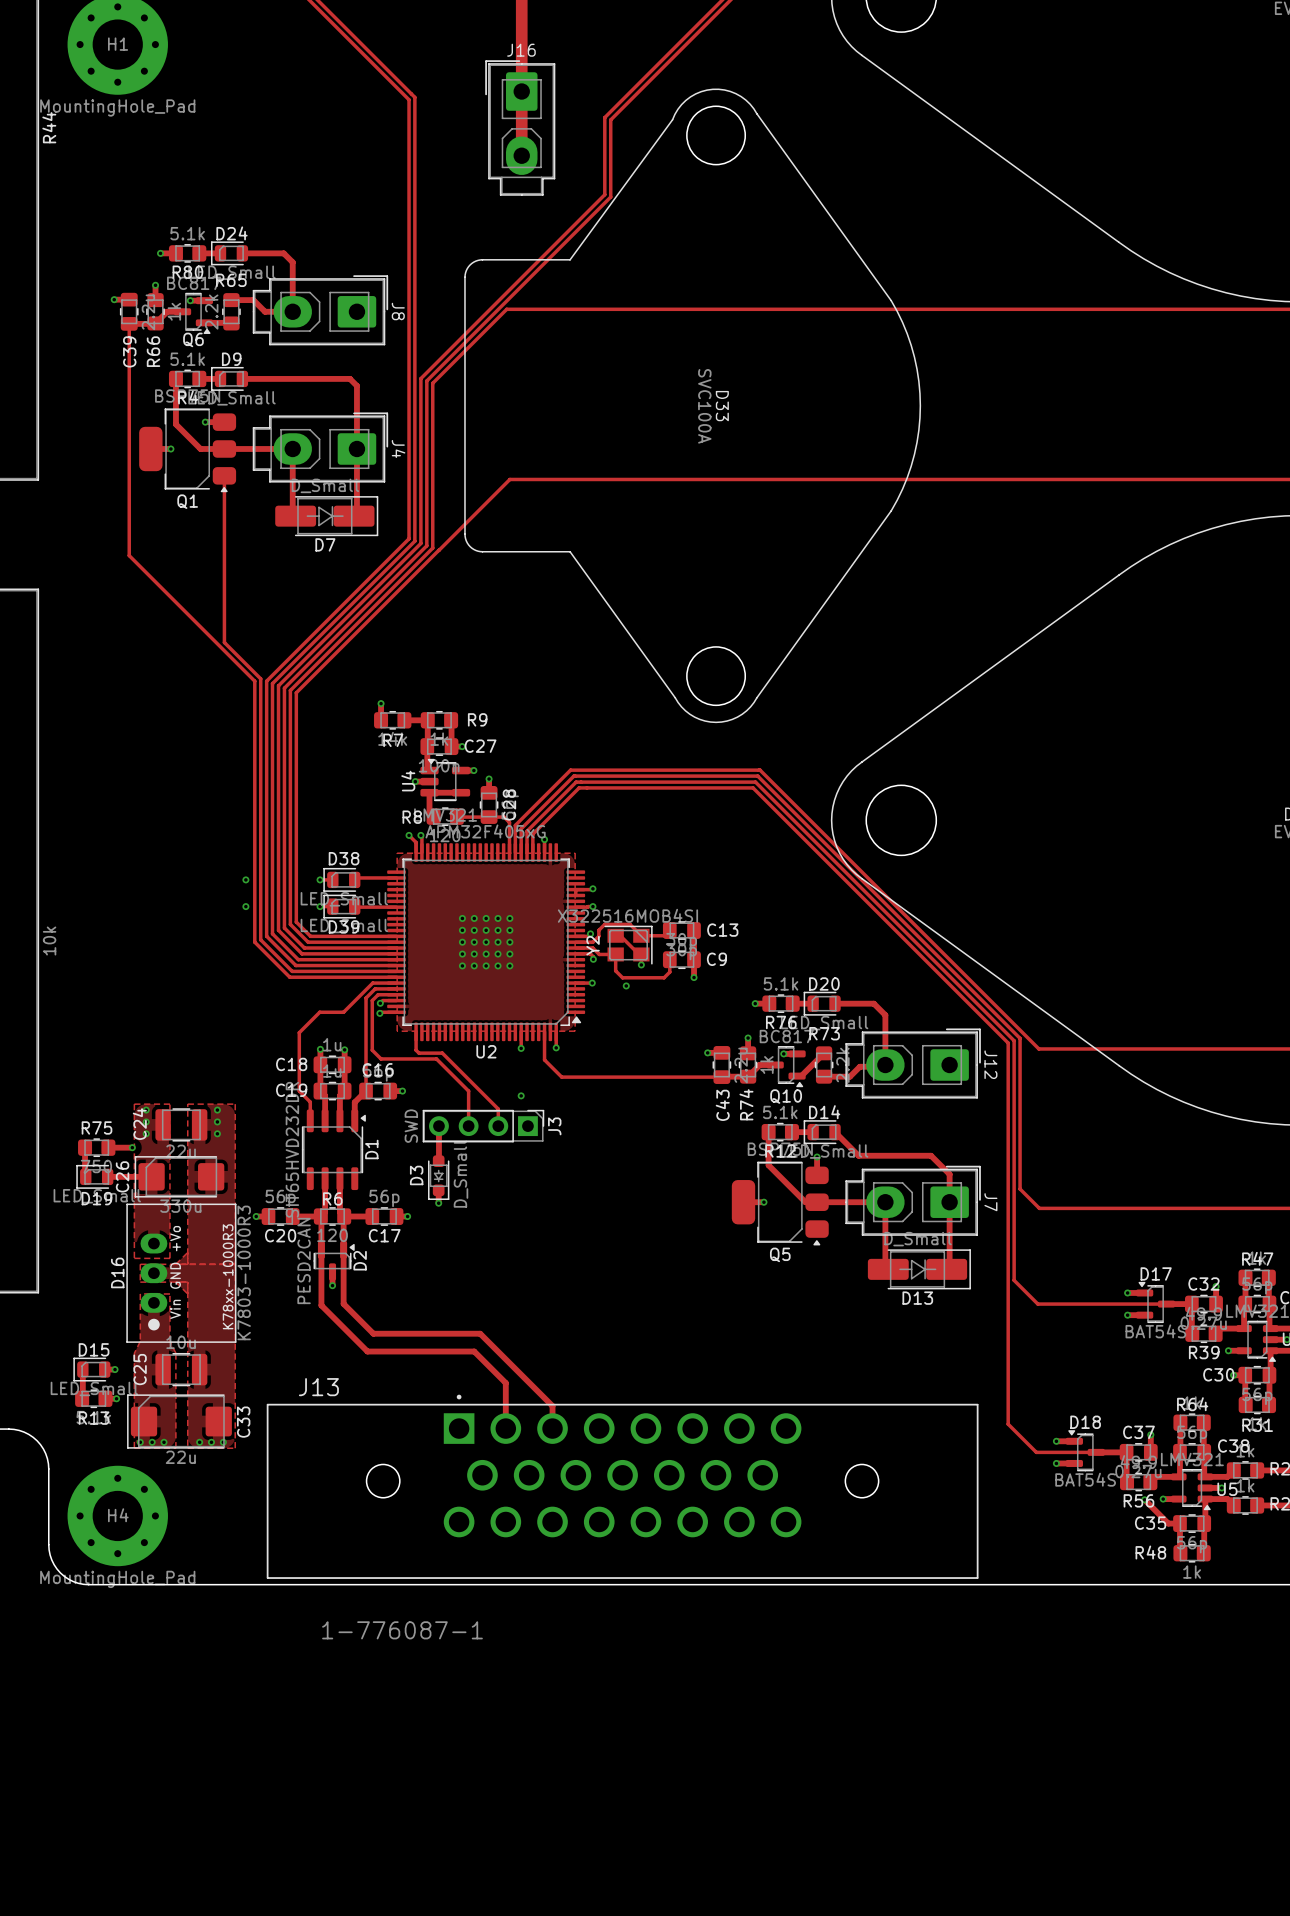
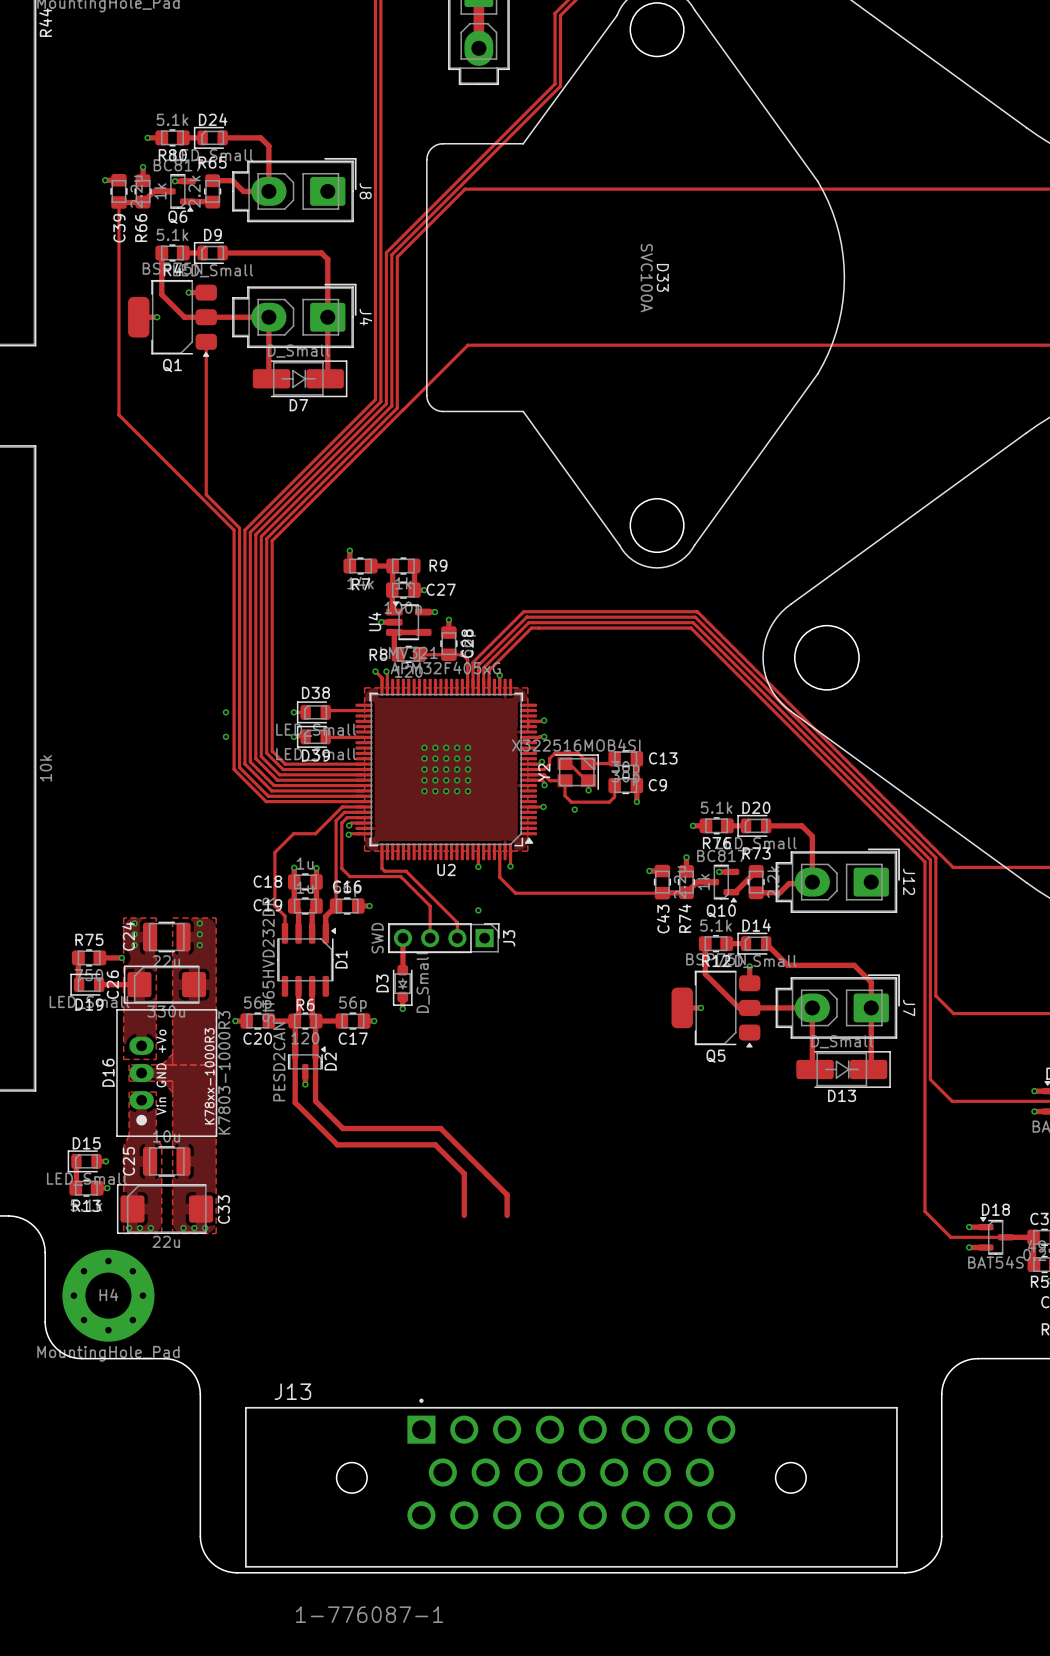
J13 position: (622, 1486) -> (571, 1483)
board edge: (178, 1584) (1066, 1584) -> (163, 1358) (173, 1359) (185, 1365) (192, 1372) (198, 1384) (201, 1545) (205, 1554) (214, 1565) (227, 1571) (236, 1572) (914, 1571) (931, 1562) (936, 1554) (941, 1540) (943, 1384) (949, 1372) (956, 1365) (968, 1359) (978, 1358)

